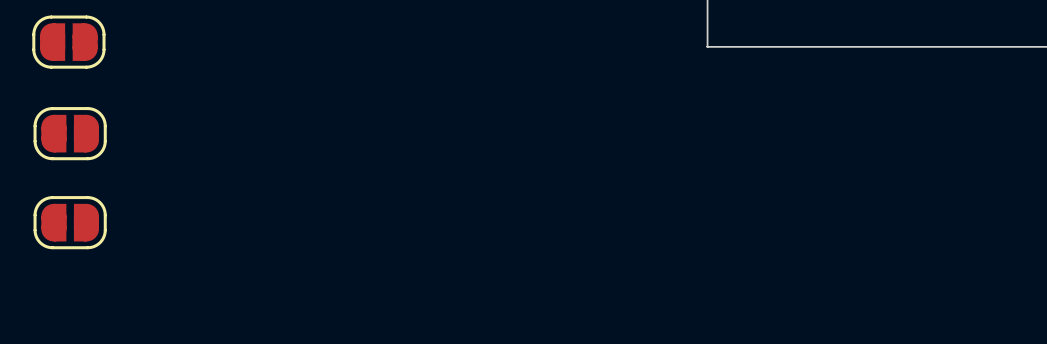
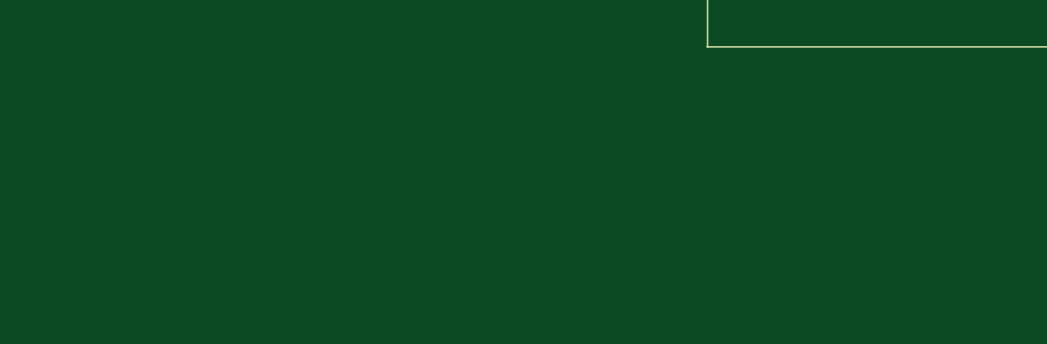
part: (68, 42) -> none
part: (70, 133) -> none
part: (70, 222) -> none

